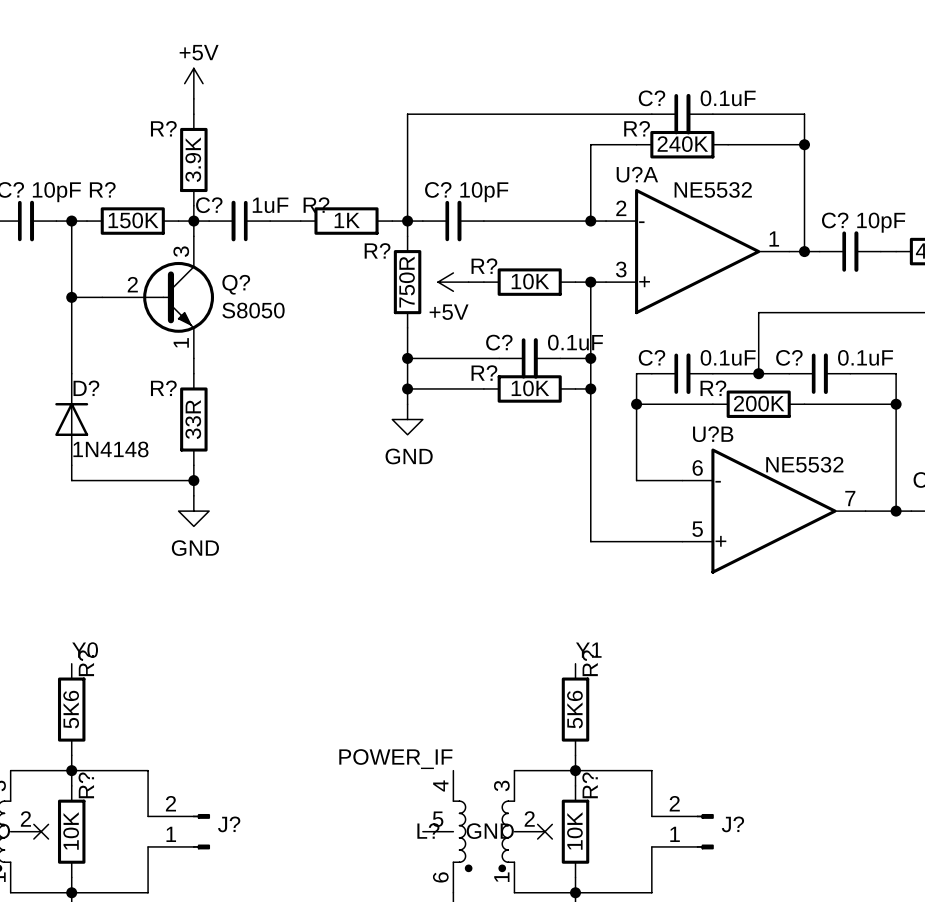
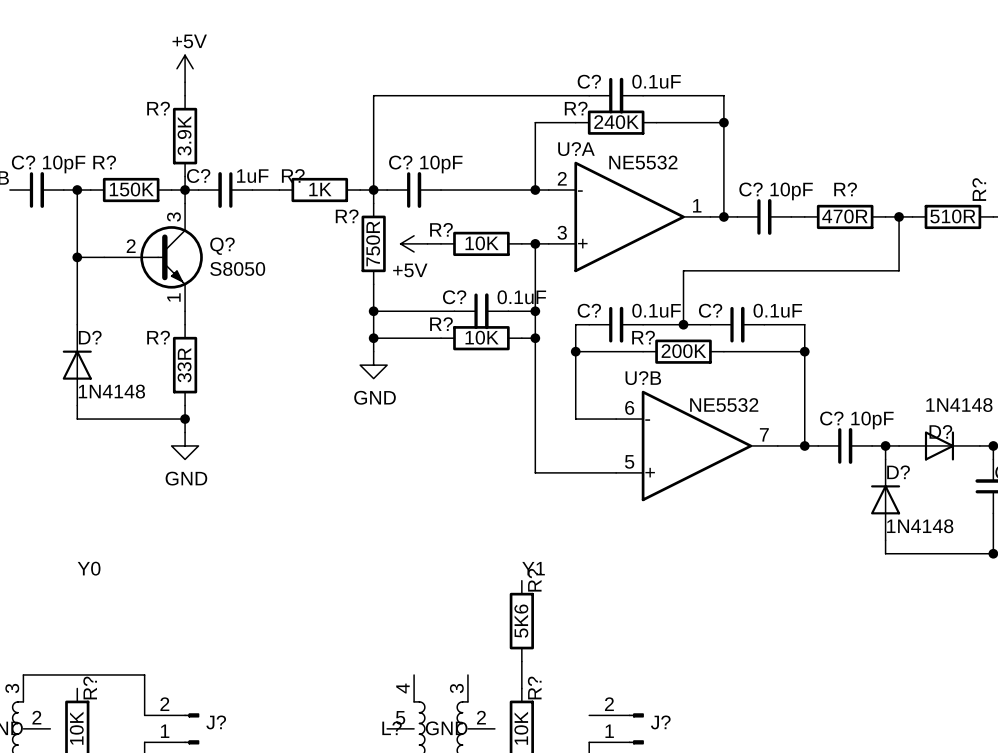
R?: 5K6 (71, 709) -> none
wire: (71, 755) (71, 785) -> none
label: POWER_IF (395, 759) -> none
junction: (71, 770) -> none
wire: (514, 770) (651, 770) (651, 816) -> none
junction: (575, 770) -> none
no-connect mark: (41, 831) -> none
no-connect mark: (544, 831) -> none

